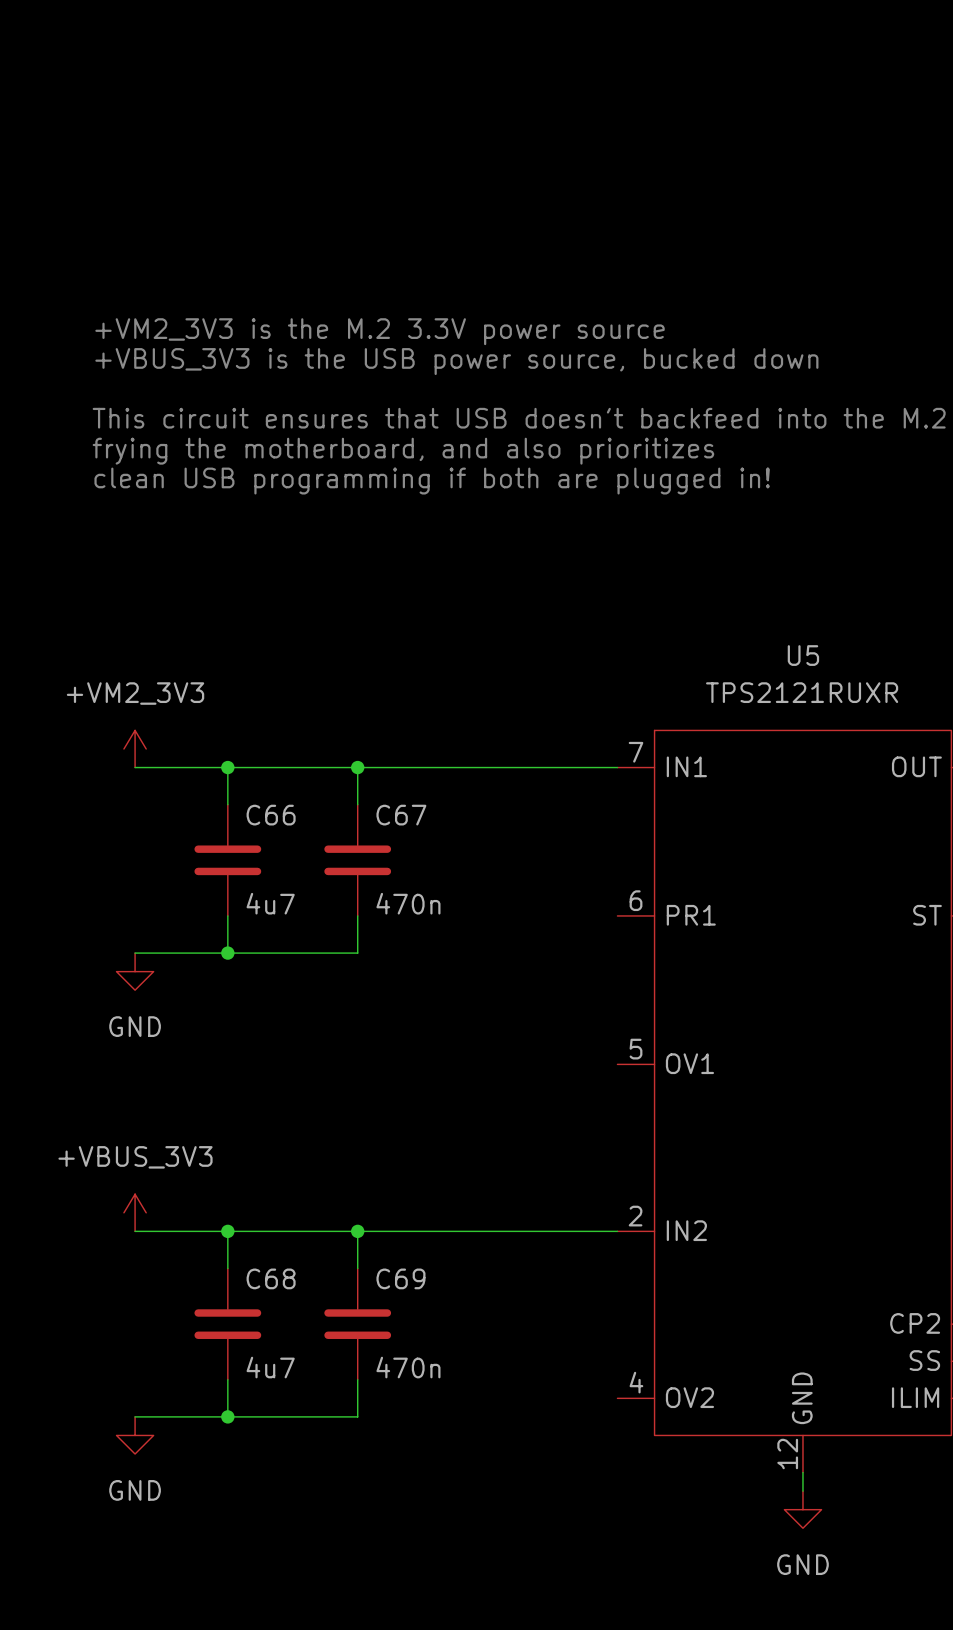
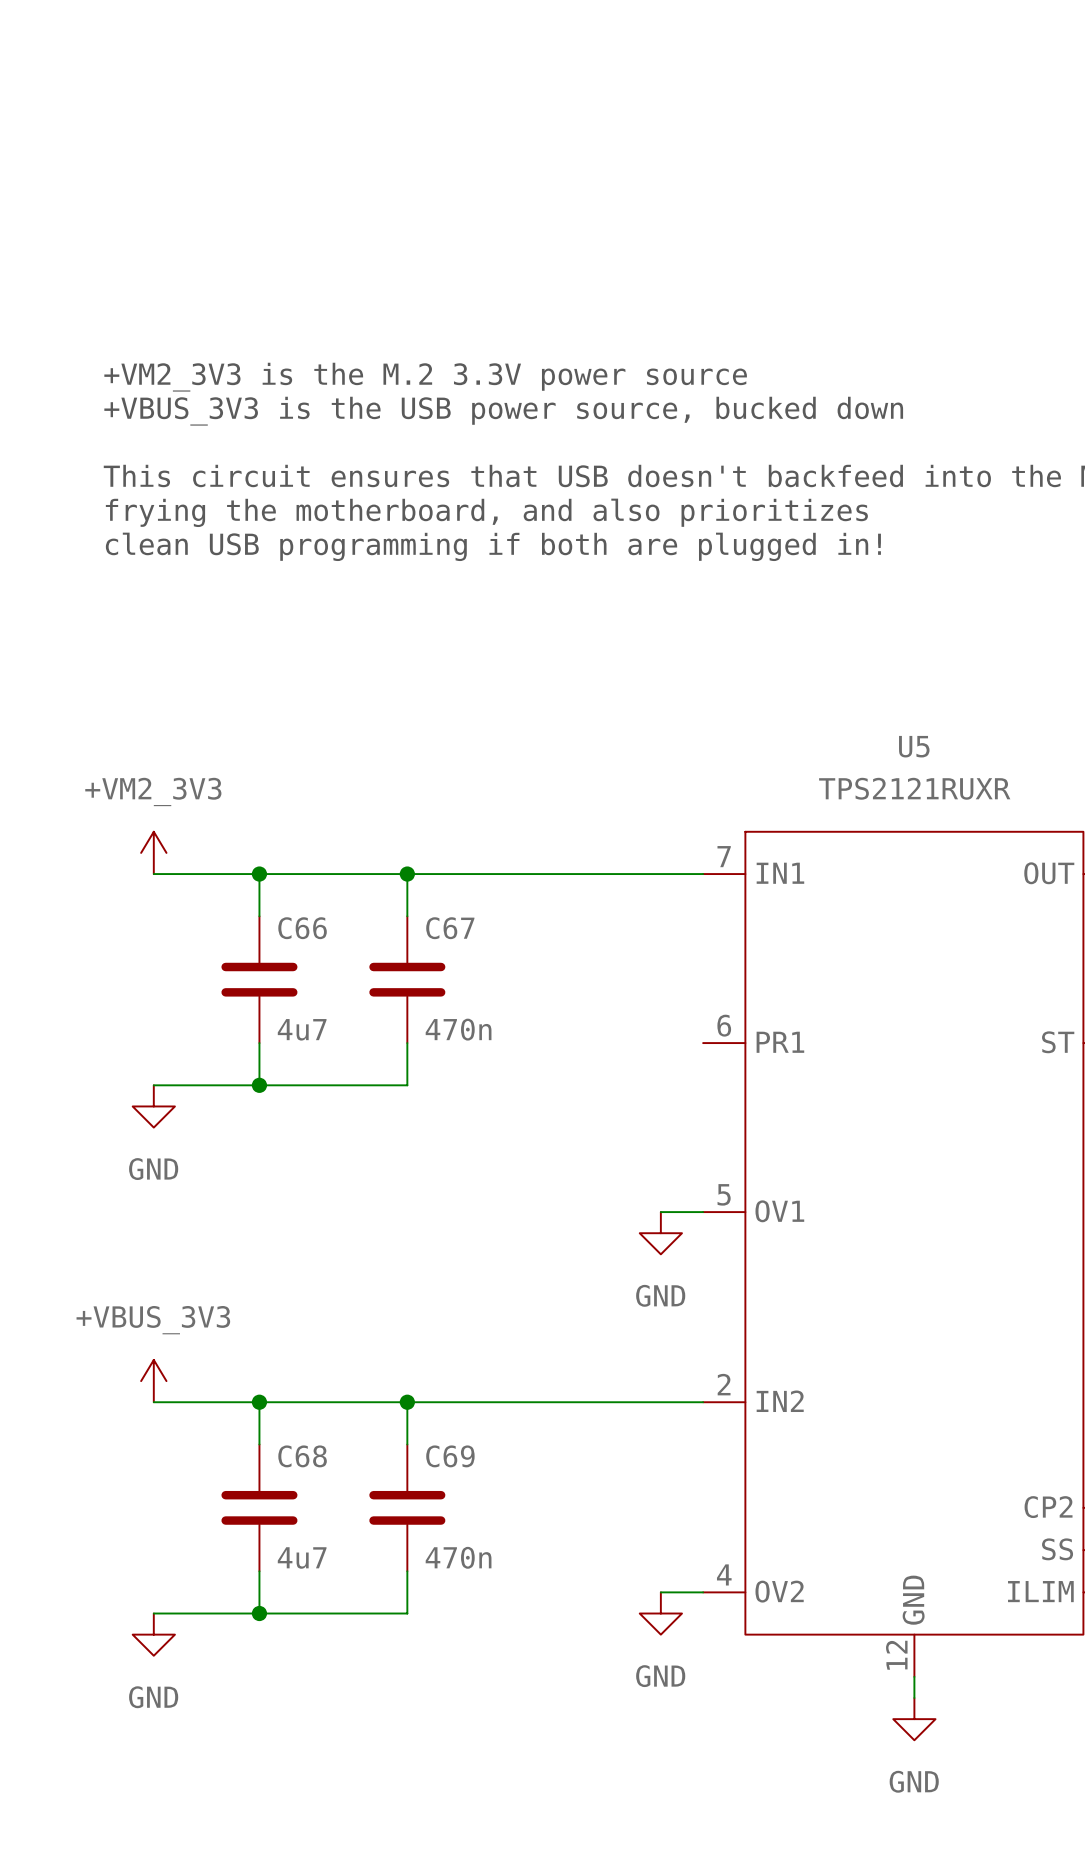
wire: none -> (660, 1212) (703, 1212)
power symbol: none -> GND (660, 1233)
wire: none -> (660, 1592) (703, 1592)
power symbol: none -> GND (660, 1613)

